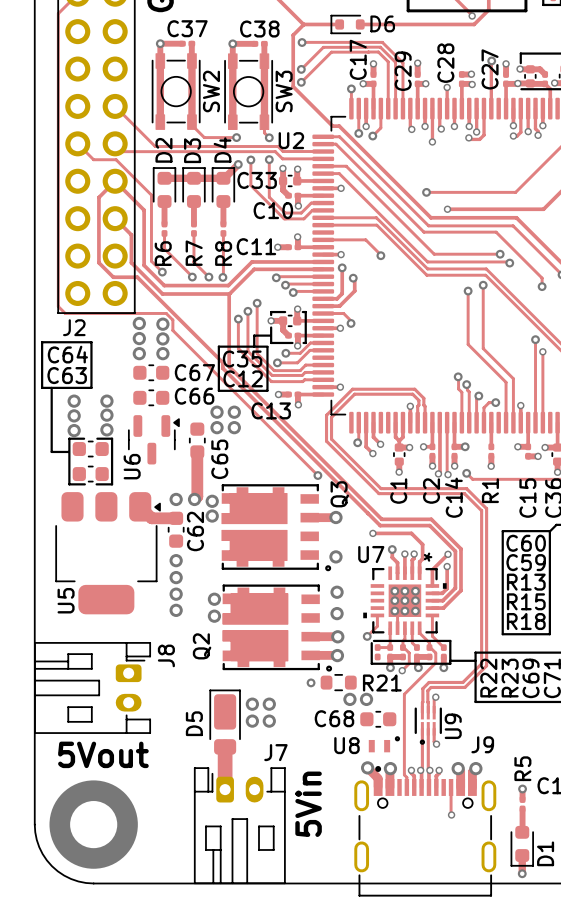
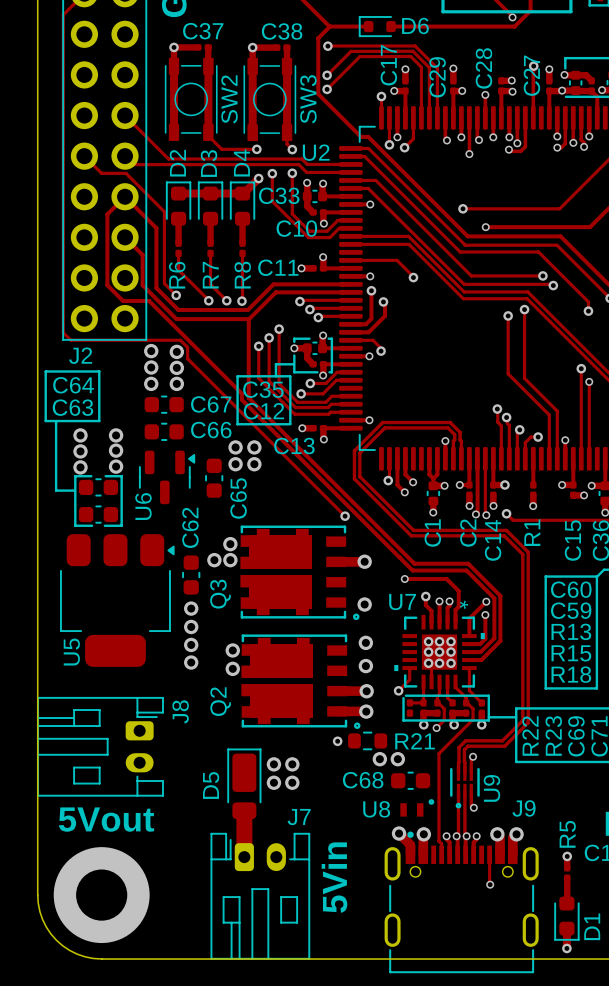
track: (197, 451) (197, 496) (194, 499) -> none
Q3 name position: Q3 (339, 494) -> Q3 (220, 594)
via: (176, 499) -> none
via: (194, 499) -> none
track: (140, 506) (151, 518) (176, 518) -> none
via: none -> (214, 560)
C62 name position: C62 (195, 531) -> C62 (190, 527)

